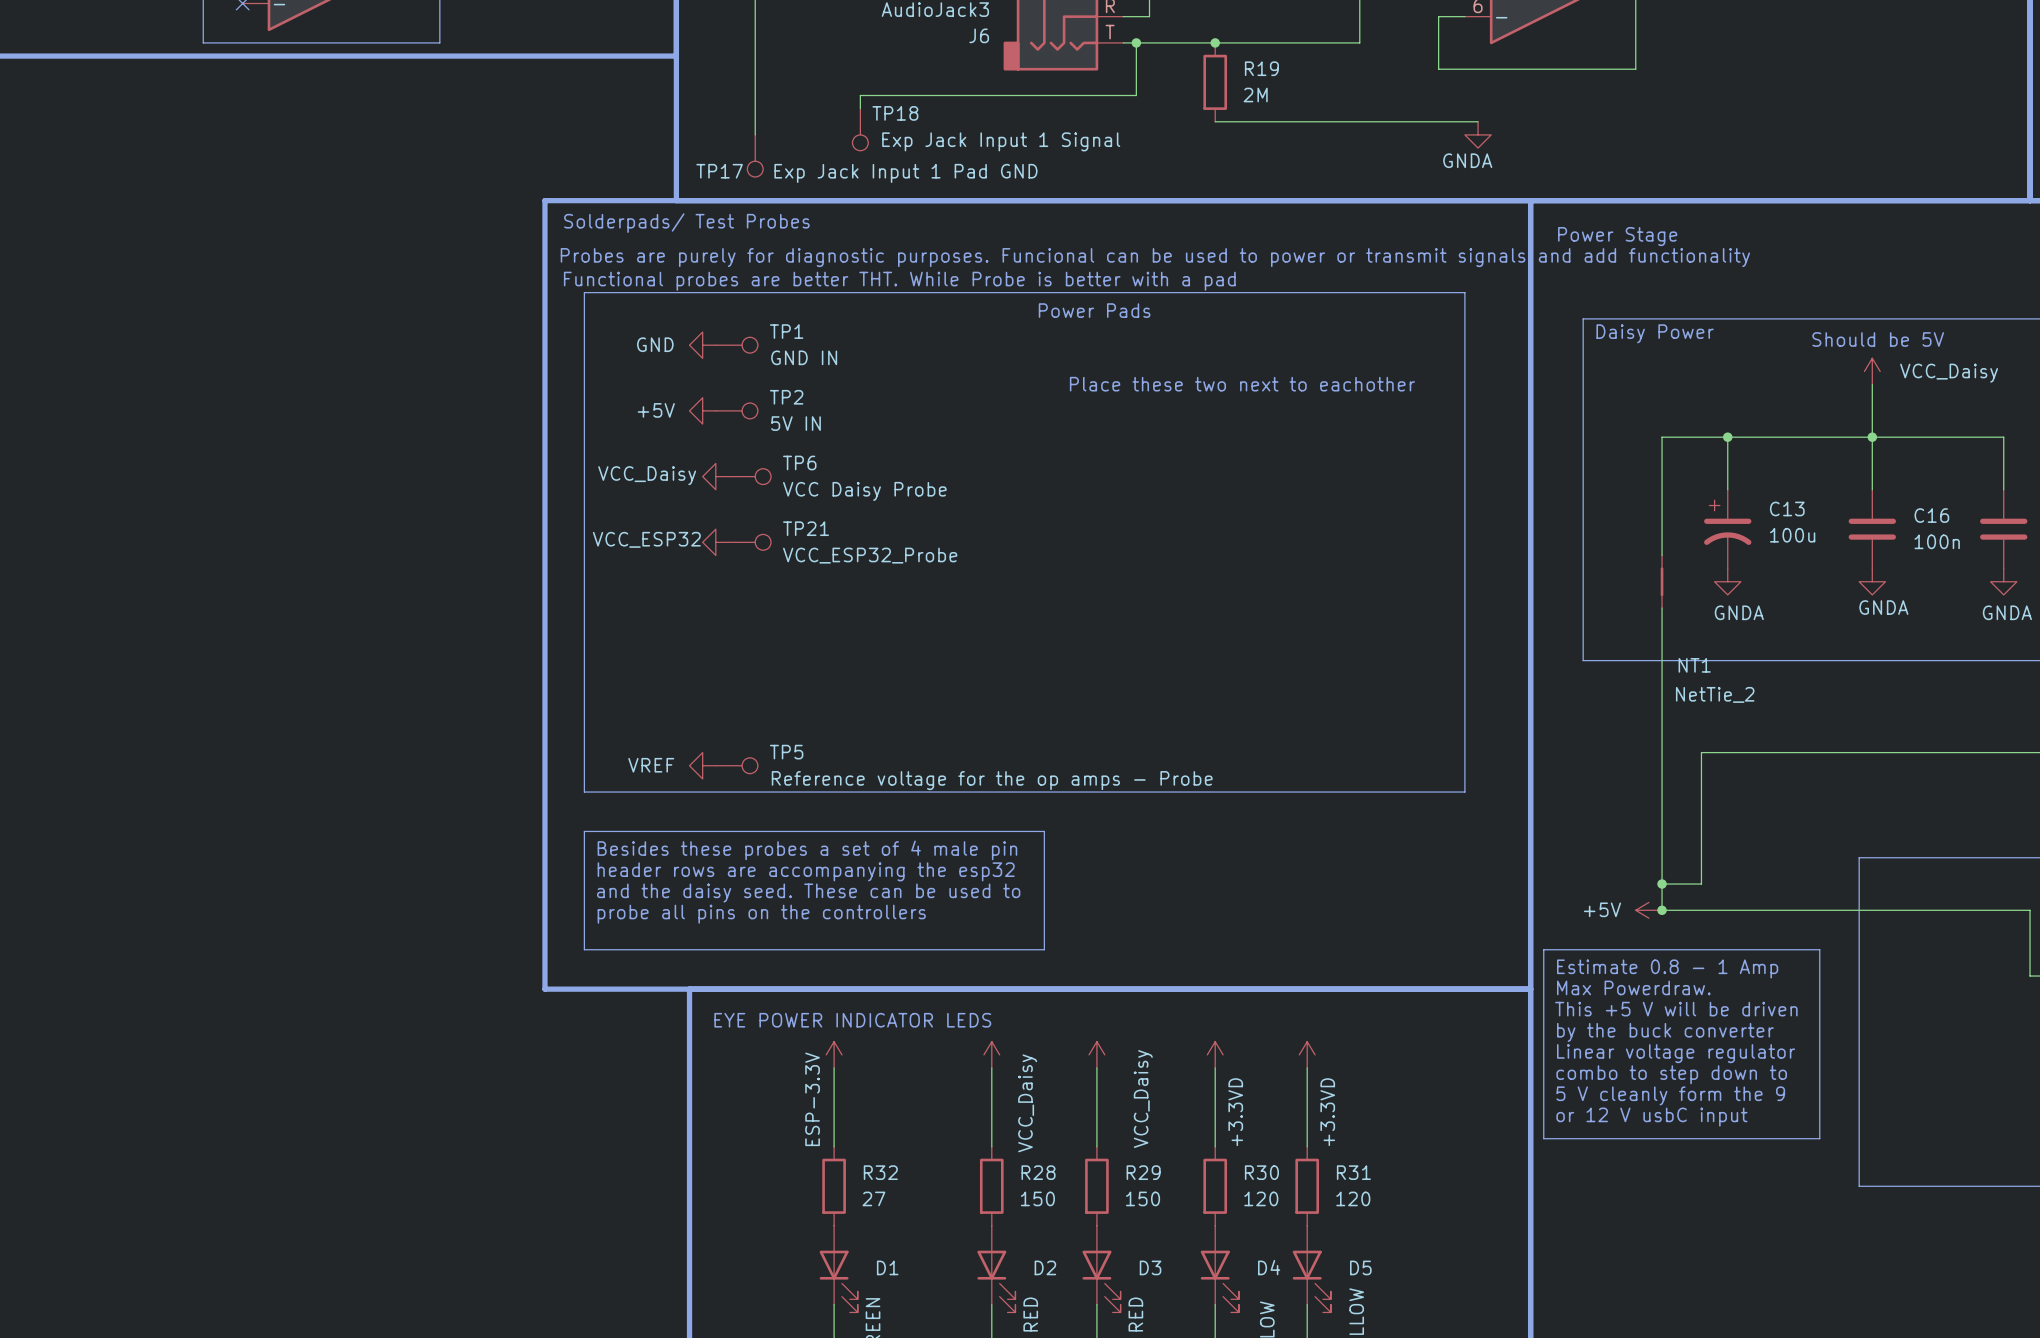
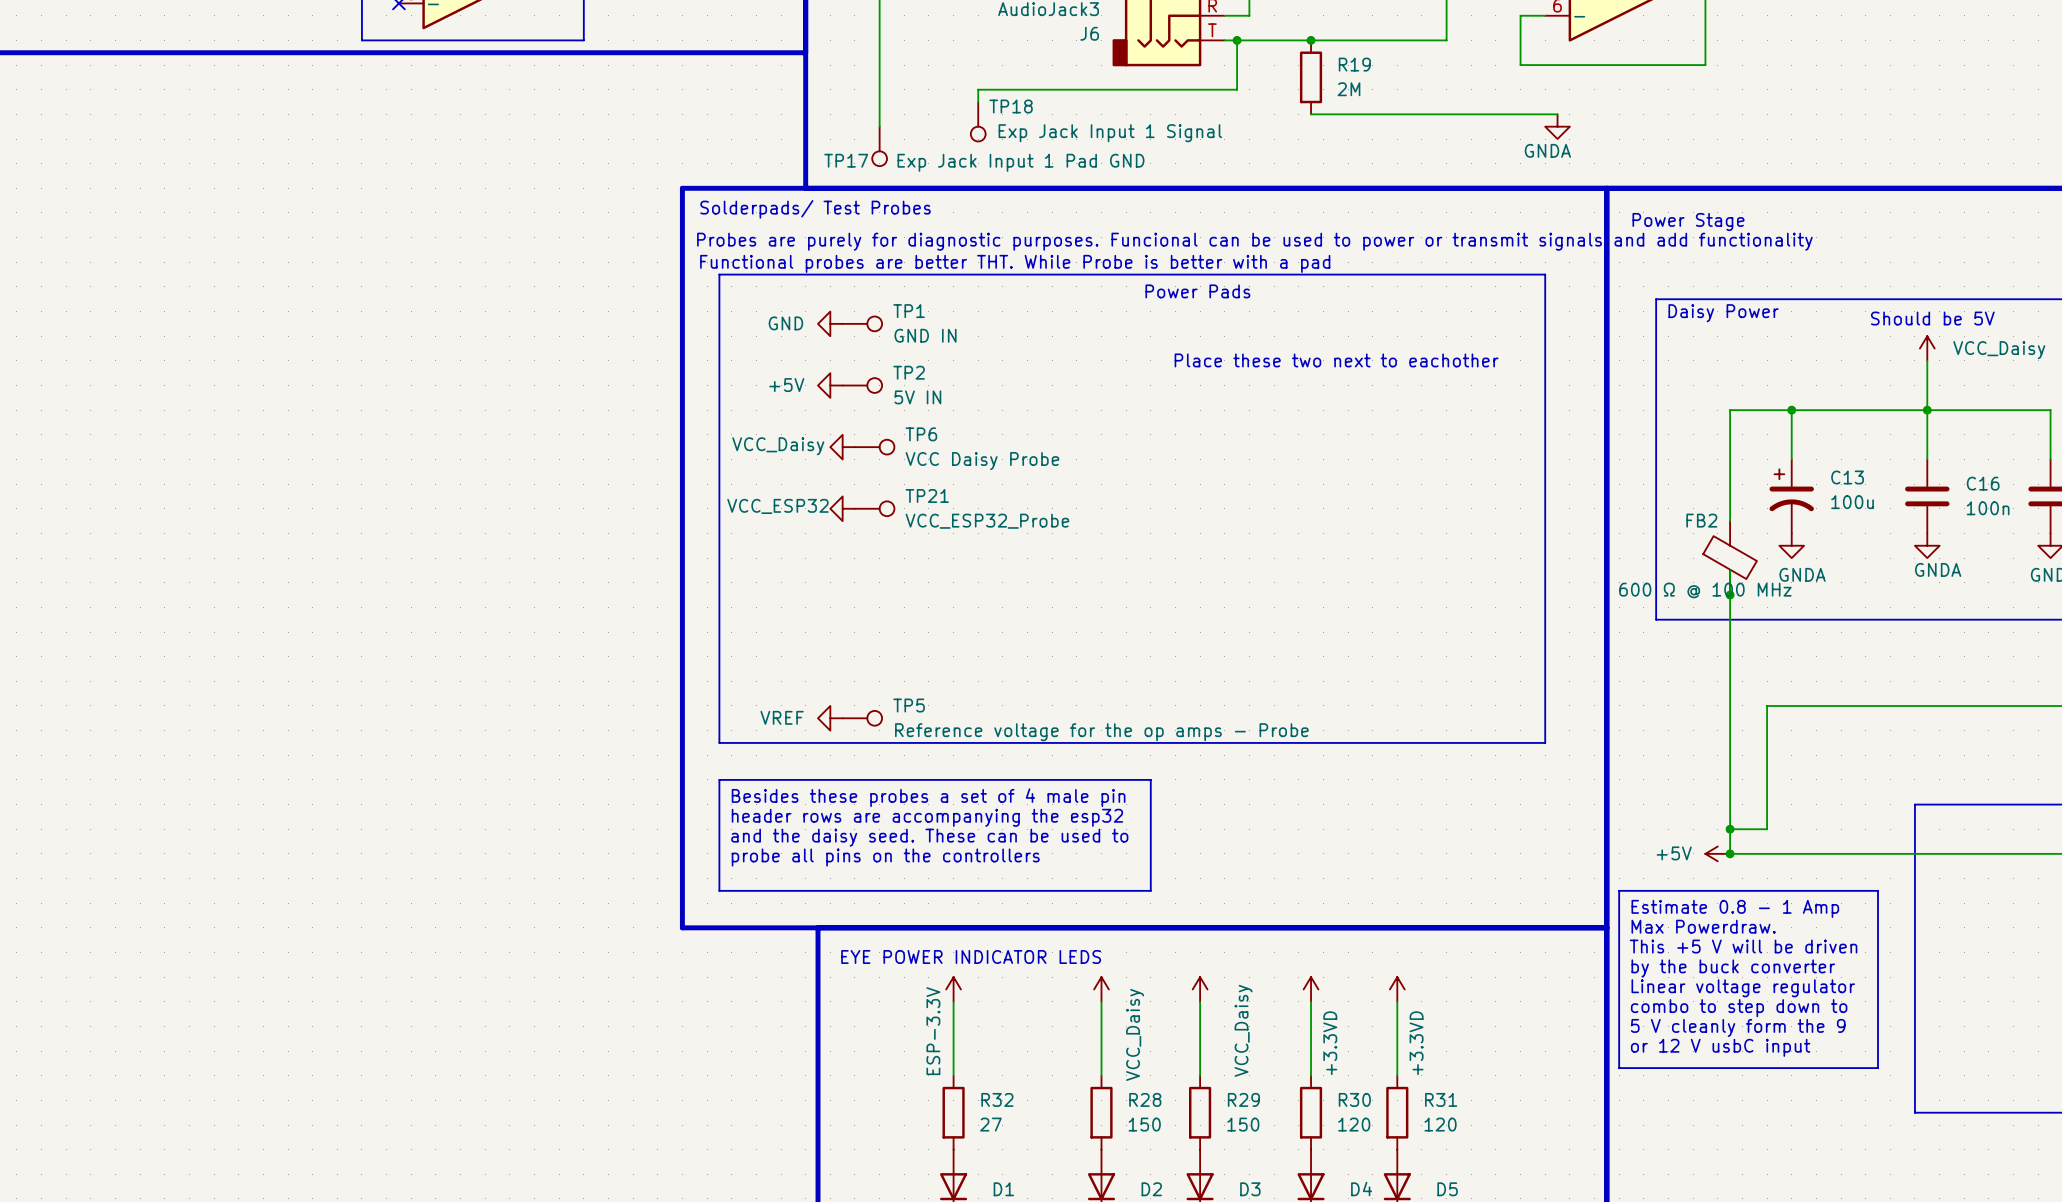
NT1: NetTie_2 (1662, 581) -> none
FB2: none -> 600 Ω @ 100 MHz (1730, 558)
junction: none -> (1730, 595)

